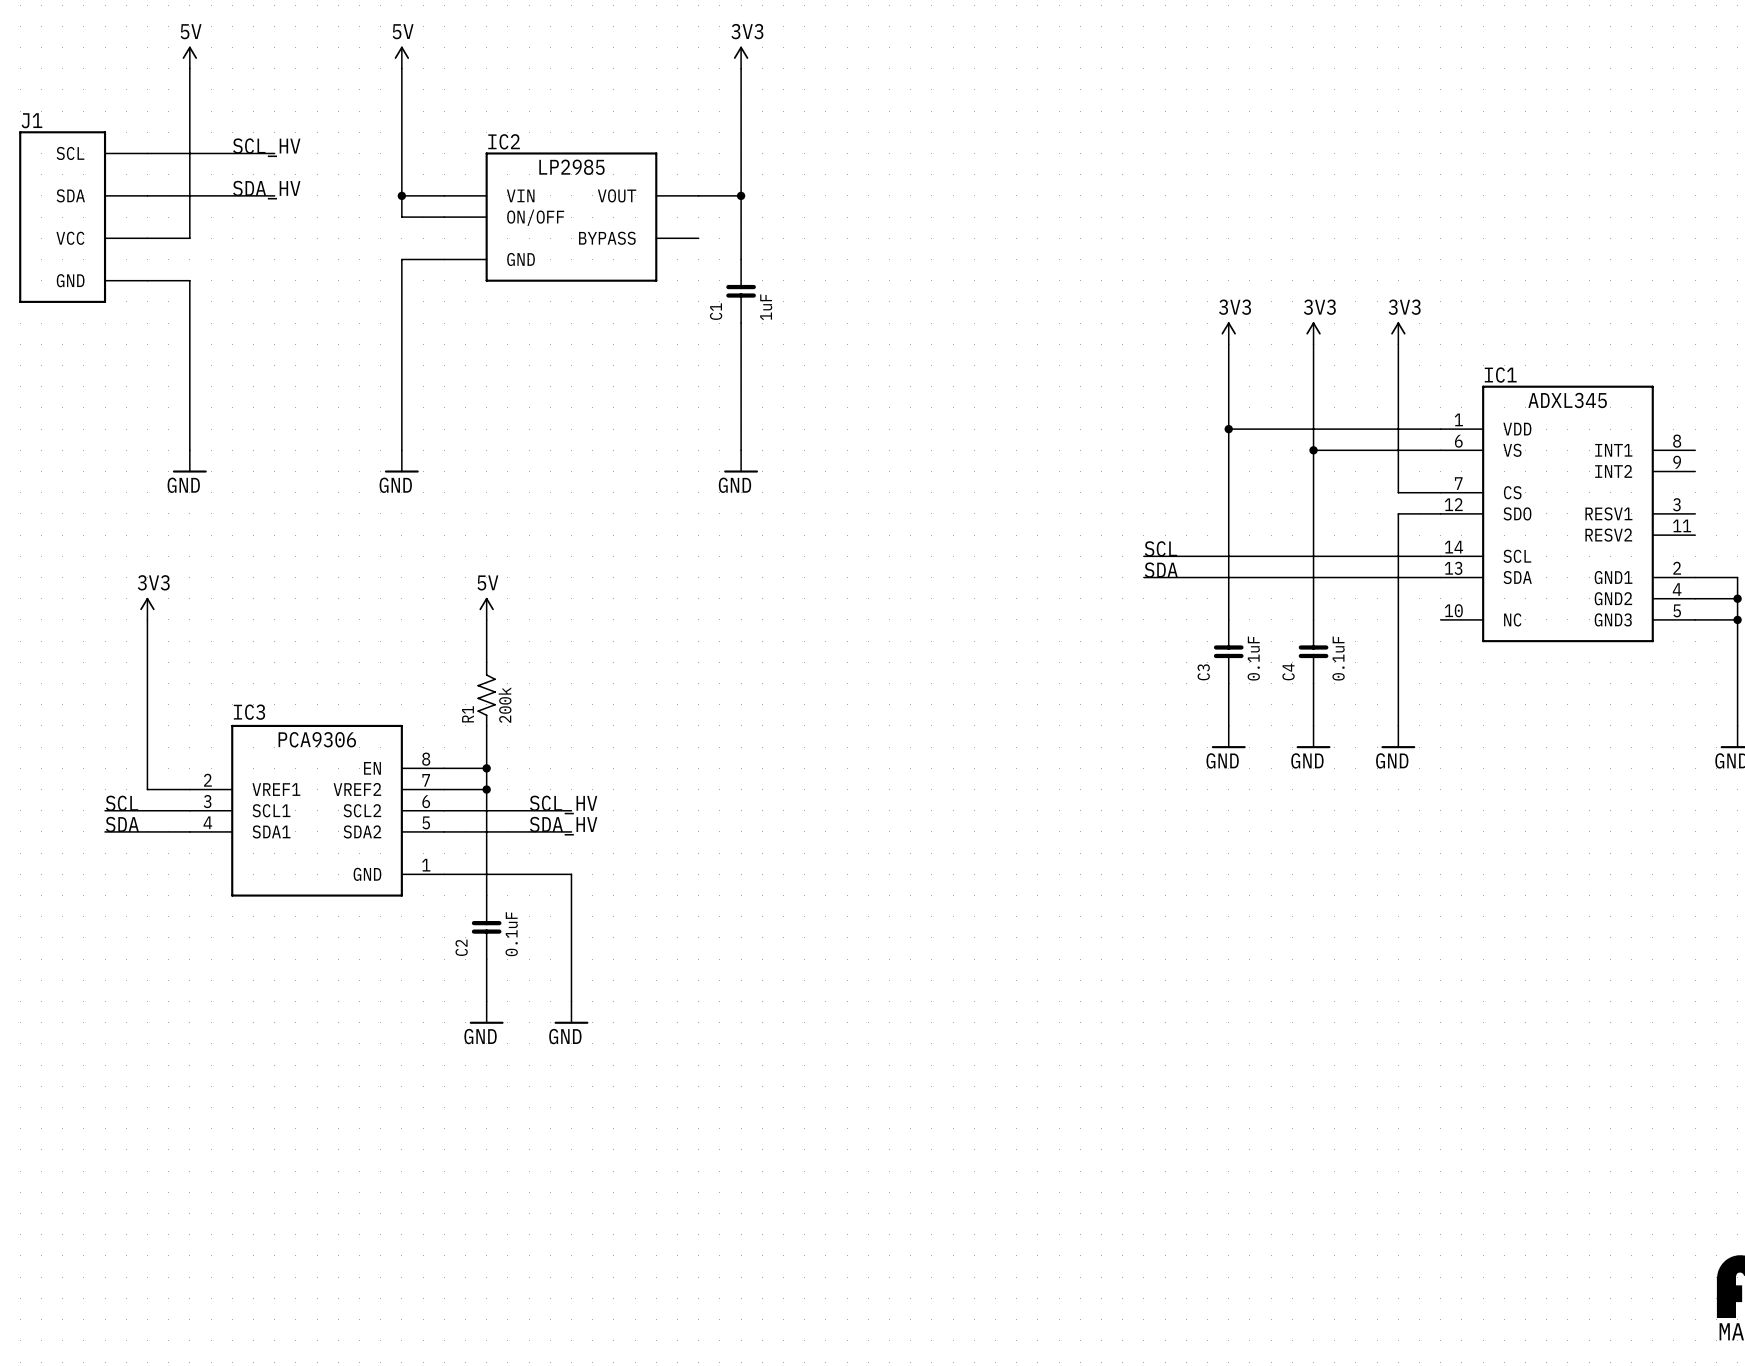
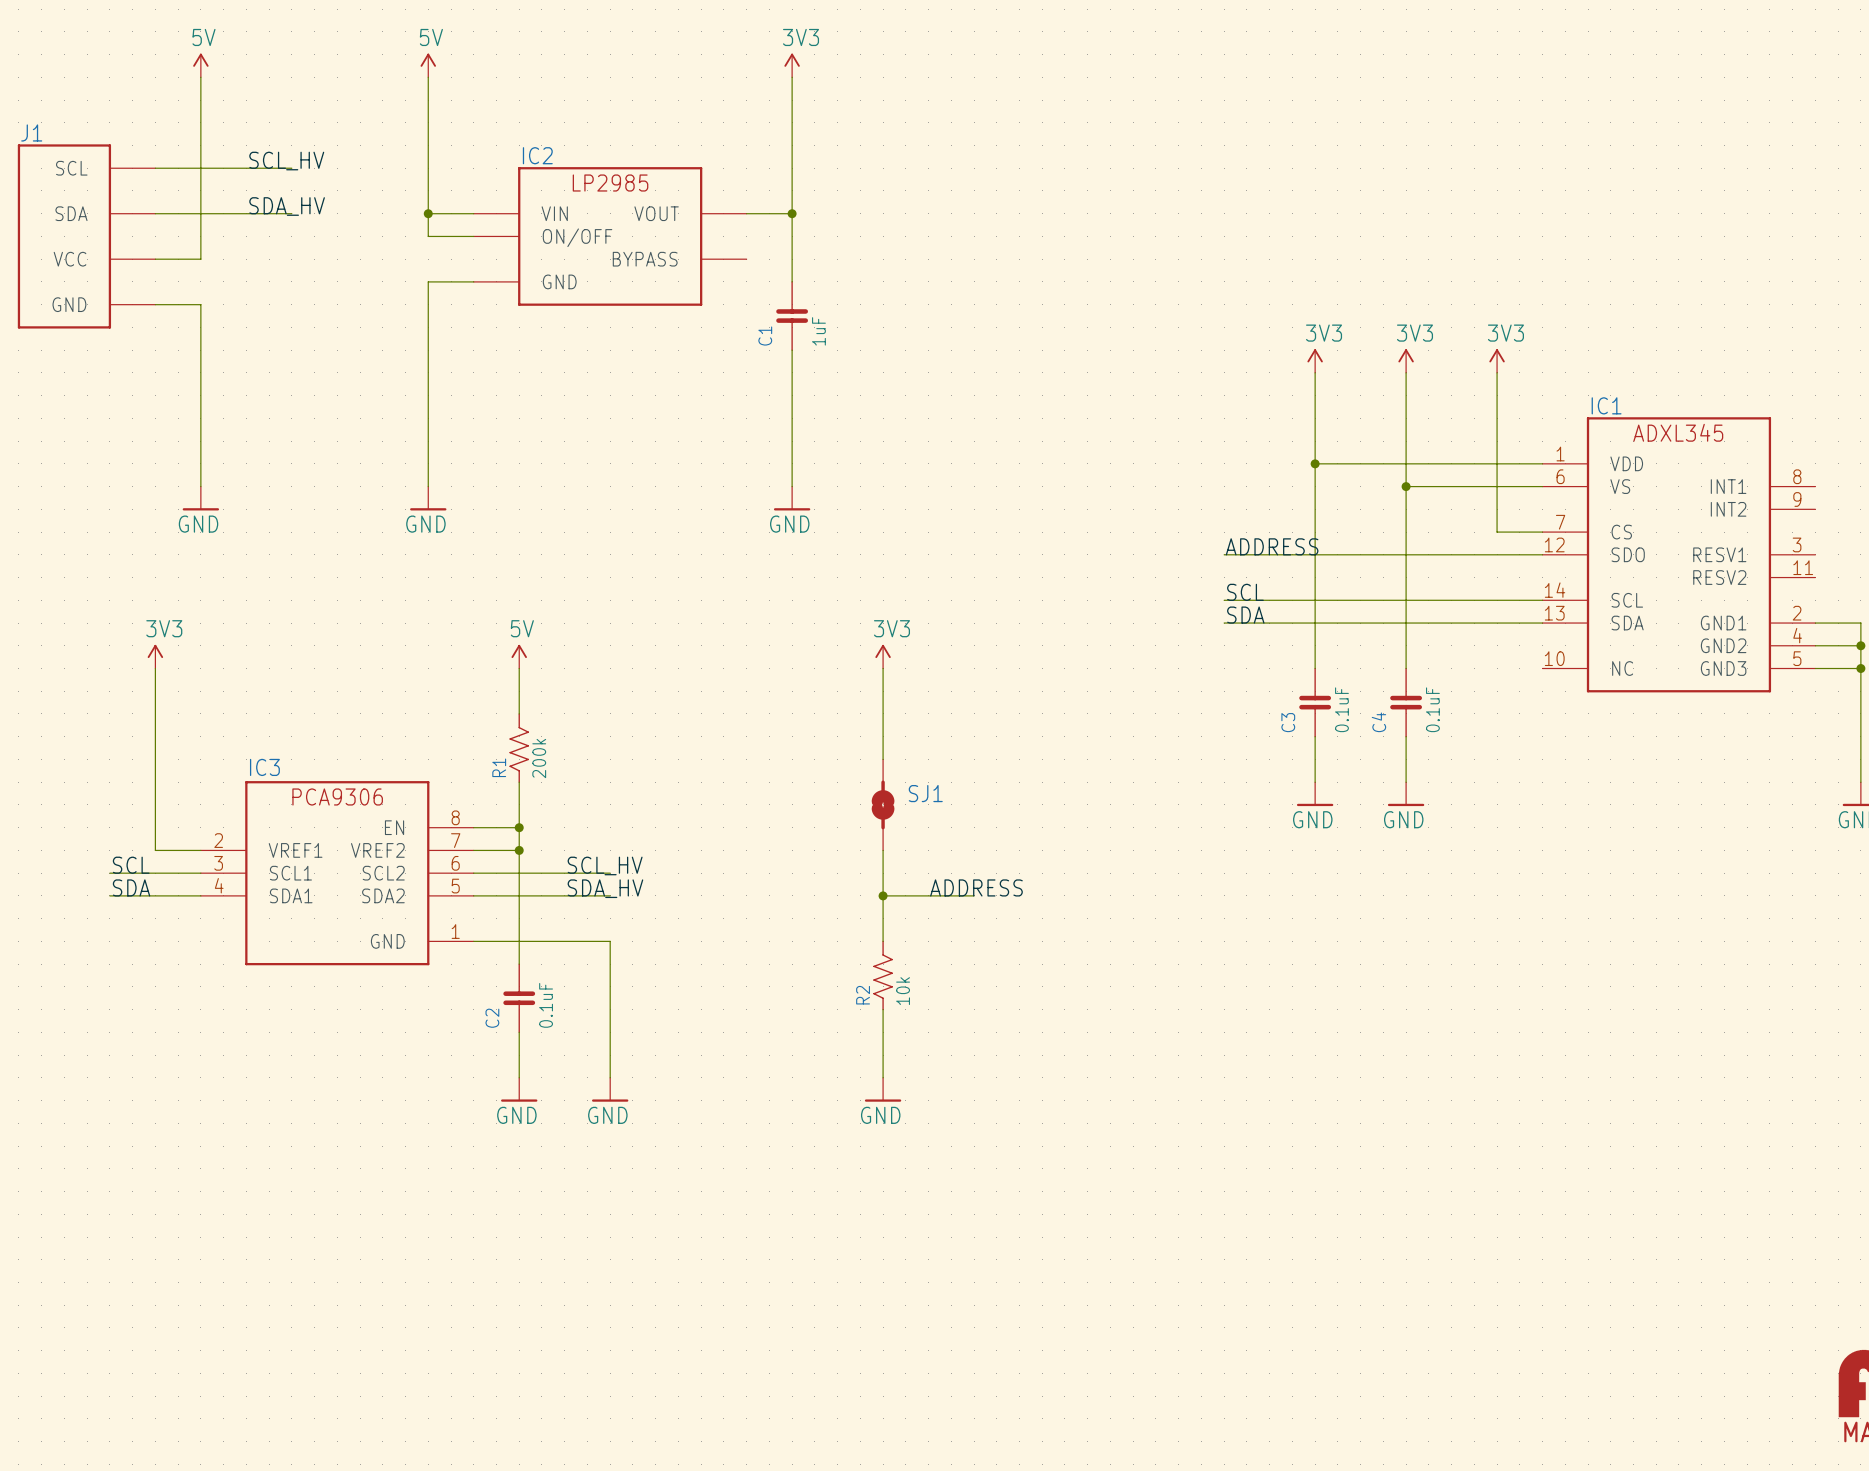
label: none -> ADDRESS (1272, 546)
wire: (1398, 513) (1398, 725) -> (1497, 554) (1224, 554)
power symbol: none -> 3V3 (883, 656)
wire: none -> (883, 668) (883, 759)
power symbol: GND (1398, 737) -> none
SJ1: none -> (883, 804)
wire: none -> (883, 850) (883, 941)
label: none -> ADDRESS (976, 887)
wire: none -> (883, 895) (974, 895)
junction: none -> (883, 895)
R2: none -> 10k (883, 975)
wire: none -> (883, 1009) (883, 1077)
power symbol: none -> GND (883, 1089)

